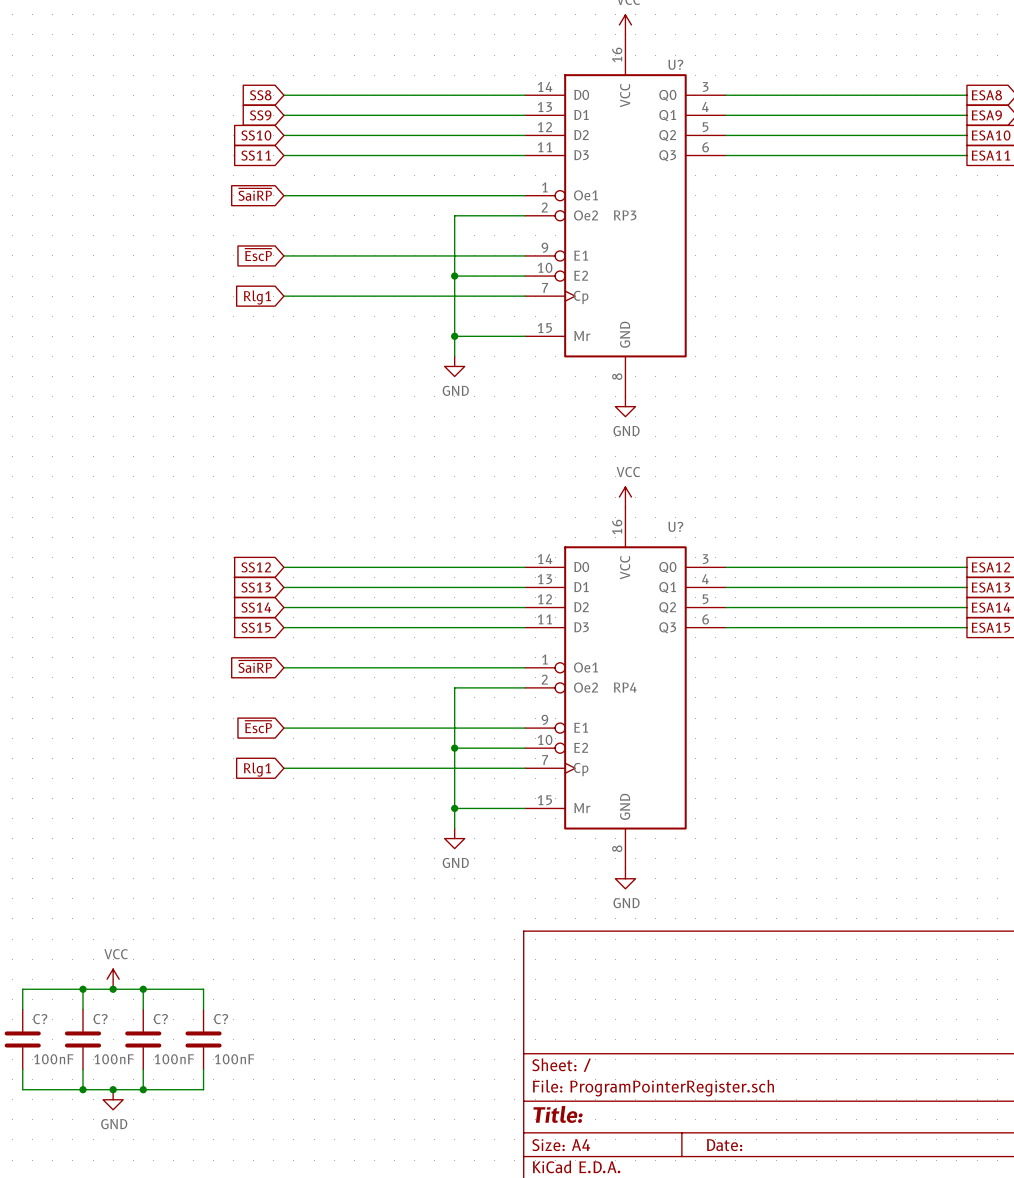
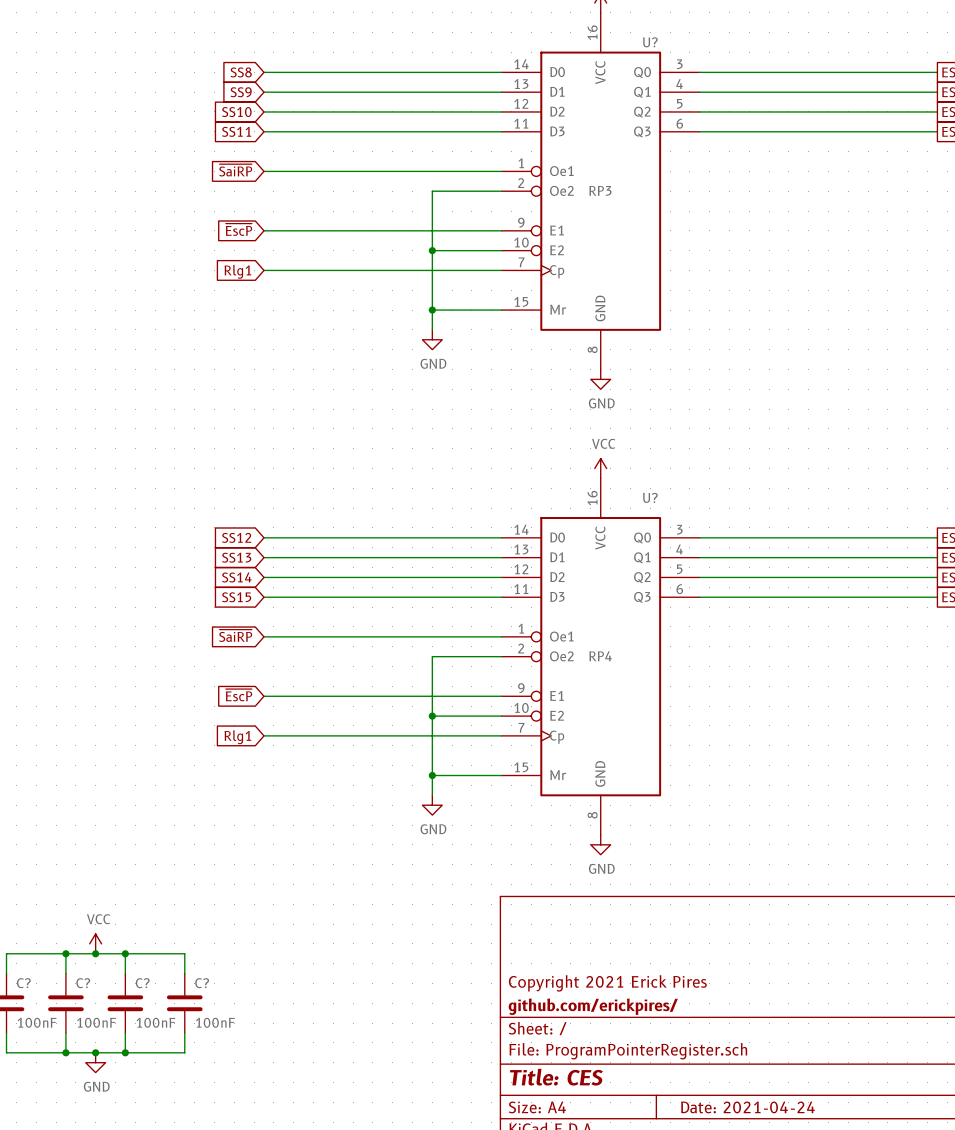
title block: none -> Copyright 2021 Erick Pires (607, 983)
title block: none -> github.com/erickpires/ (593, 1006)
title block: Title: (558, 1114) -> Title: CES (556, 1077)
title block: Date: (724, 1145) -> Date: 2021-04-24 (747, 1107)

